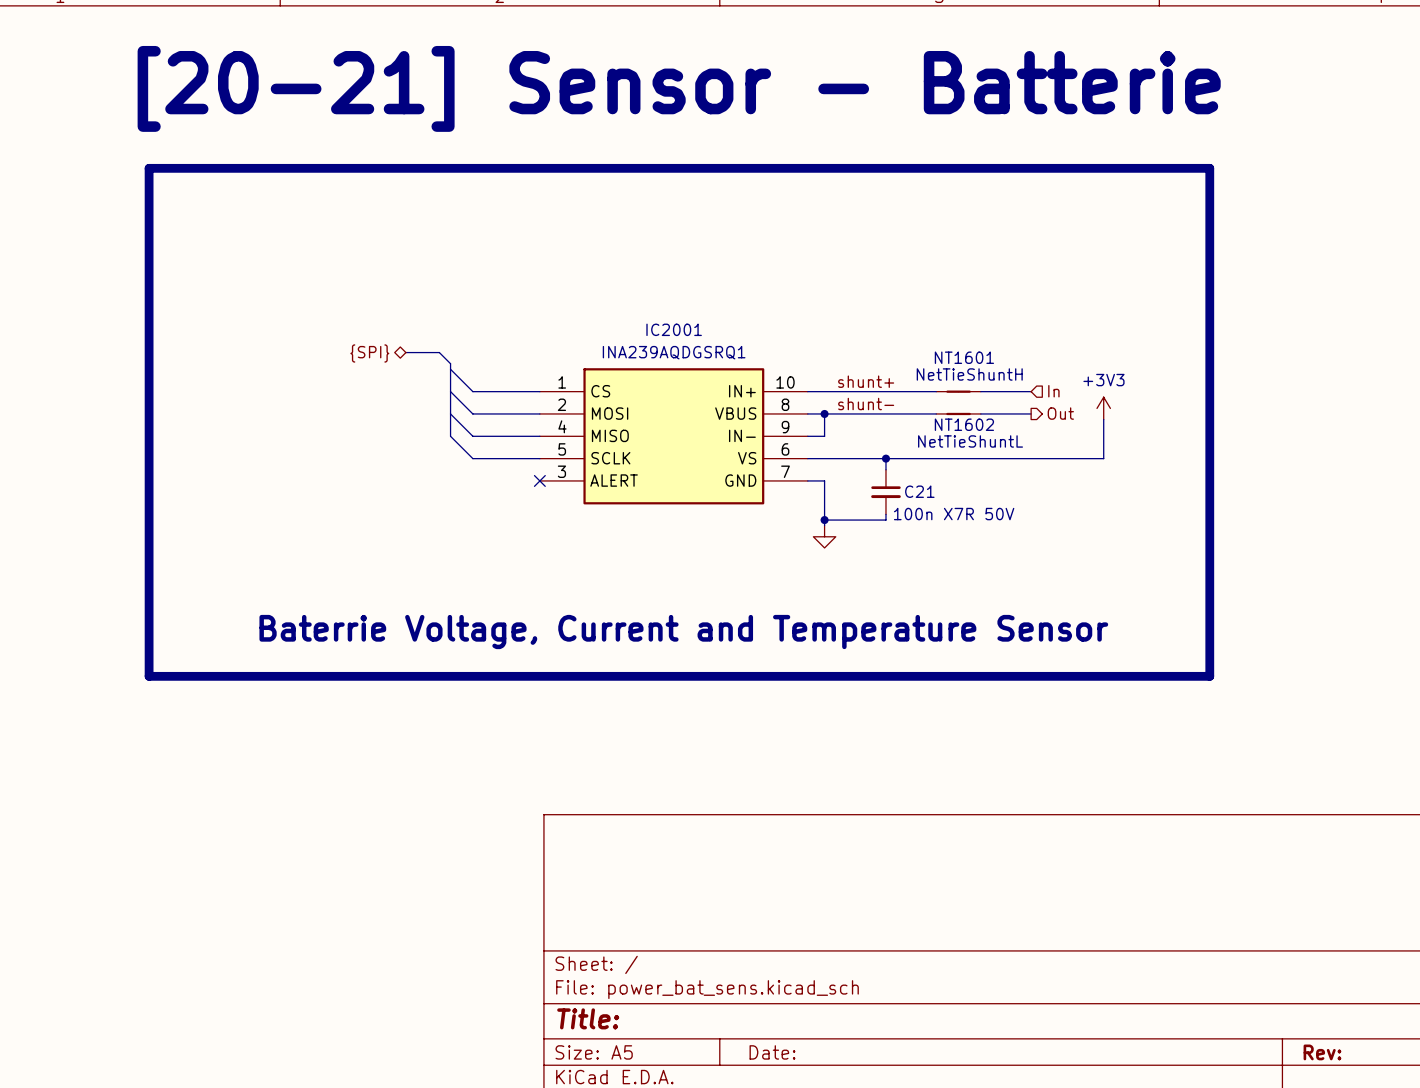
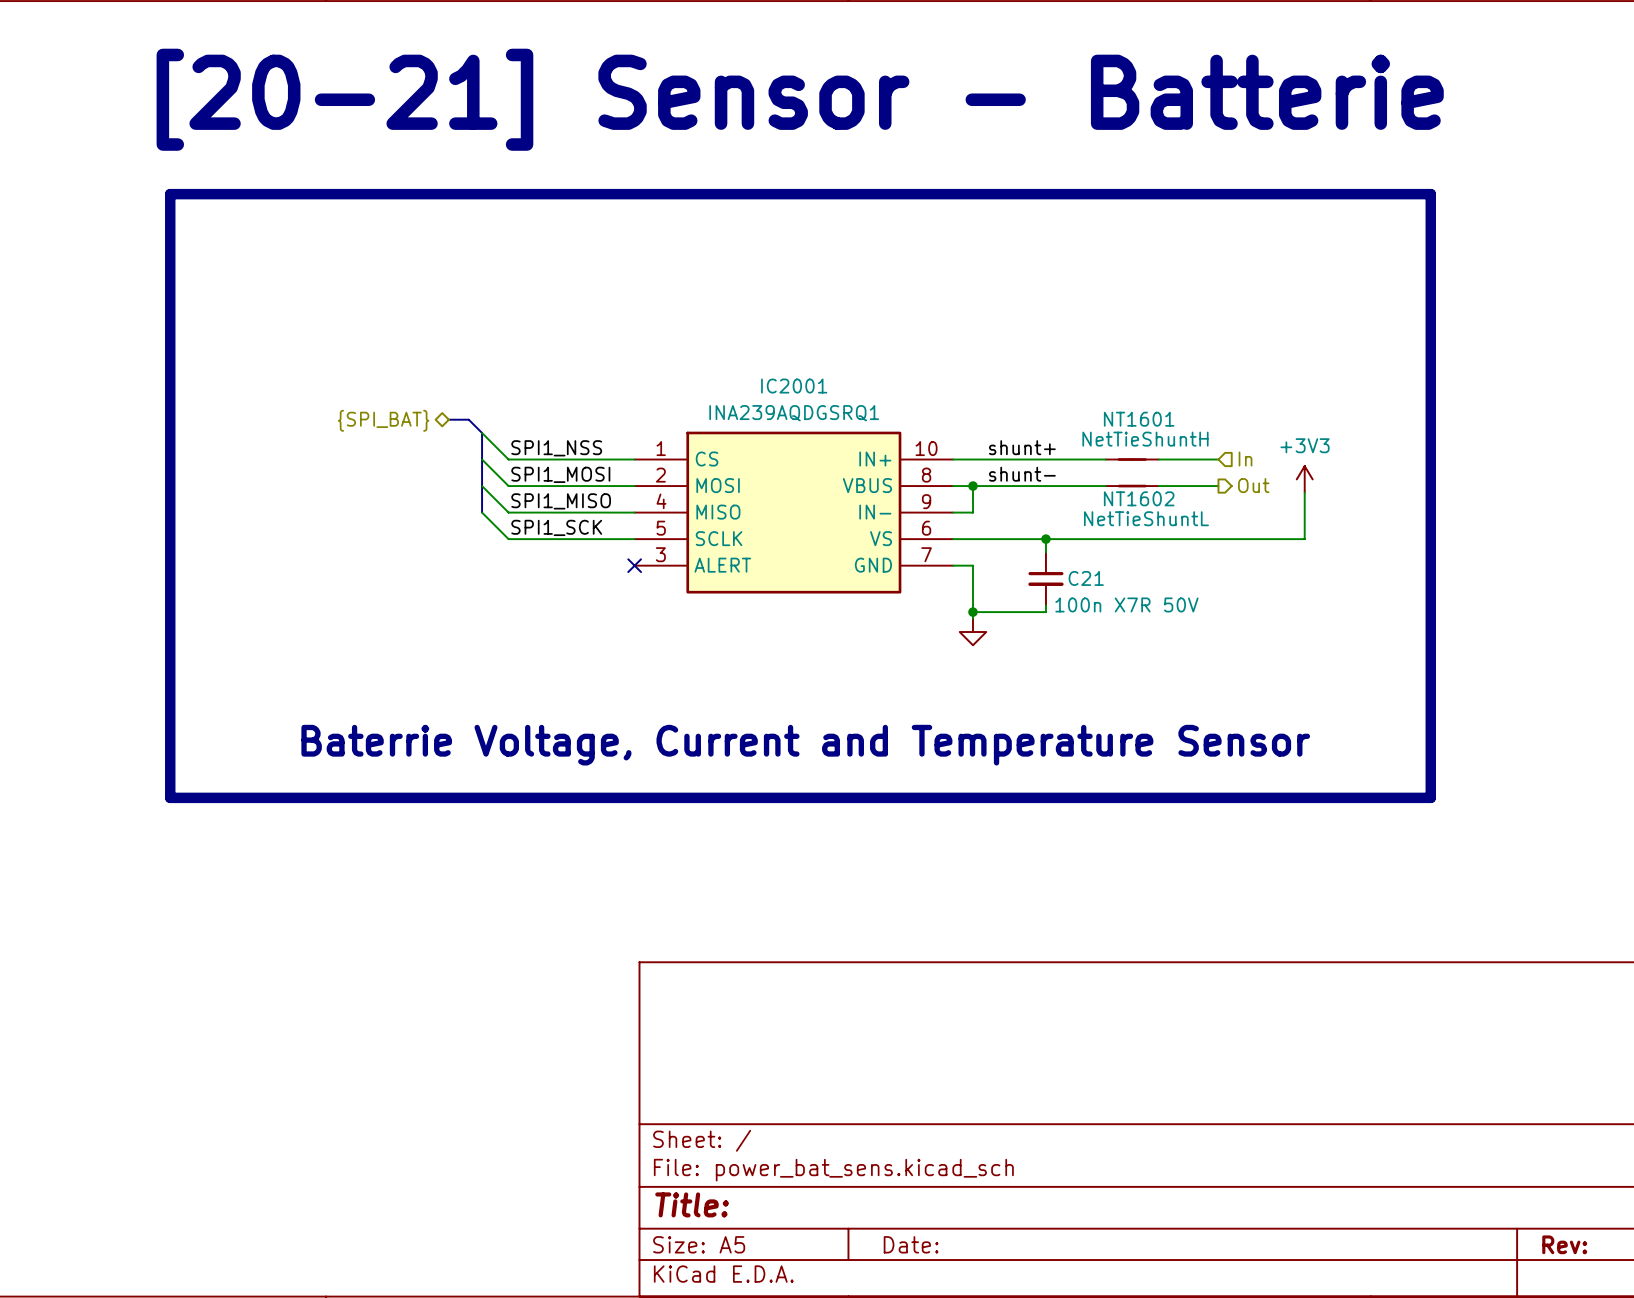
bus: (405, 352) (439, 352) (450, 363) (450, 436) -> none
hierarchical label: {SPI} (369, 353) -> {SPI_BAT} (383, 420)
bus: none -> (448, 419) (468, 419) (482, 432) (482, 512)
wire: (450, 369) (472, 391) -> (482, 432) (508, 459) (555, 459)
label: none -> SPI1_NSS (556, 448)
wire: (450, 391) (472, 413) -> (482, 459) (508, 486) (555, 486)
label: none -> SPI1_MOSI (560, 474)
wire: (450, 413) (472, 436) -> (482, 486) (508, 512) (555, 512)
label: none -> SPI1_MISO (561, 501)
wire: (450, 436) (472, 458) -> (482, 512) (508, 539) (555, 539)
label: none -> SPI1_SCK (556, 527)

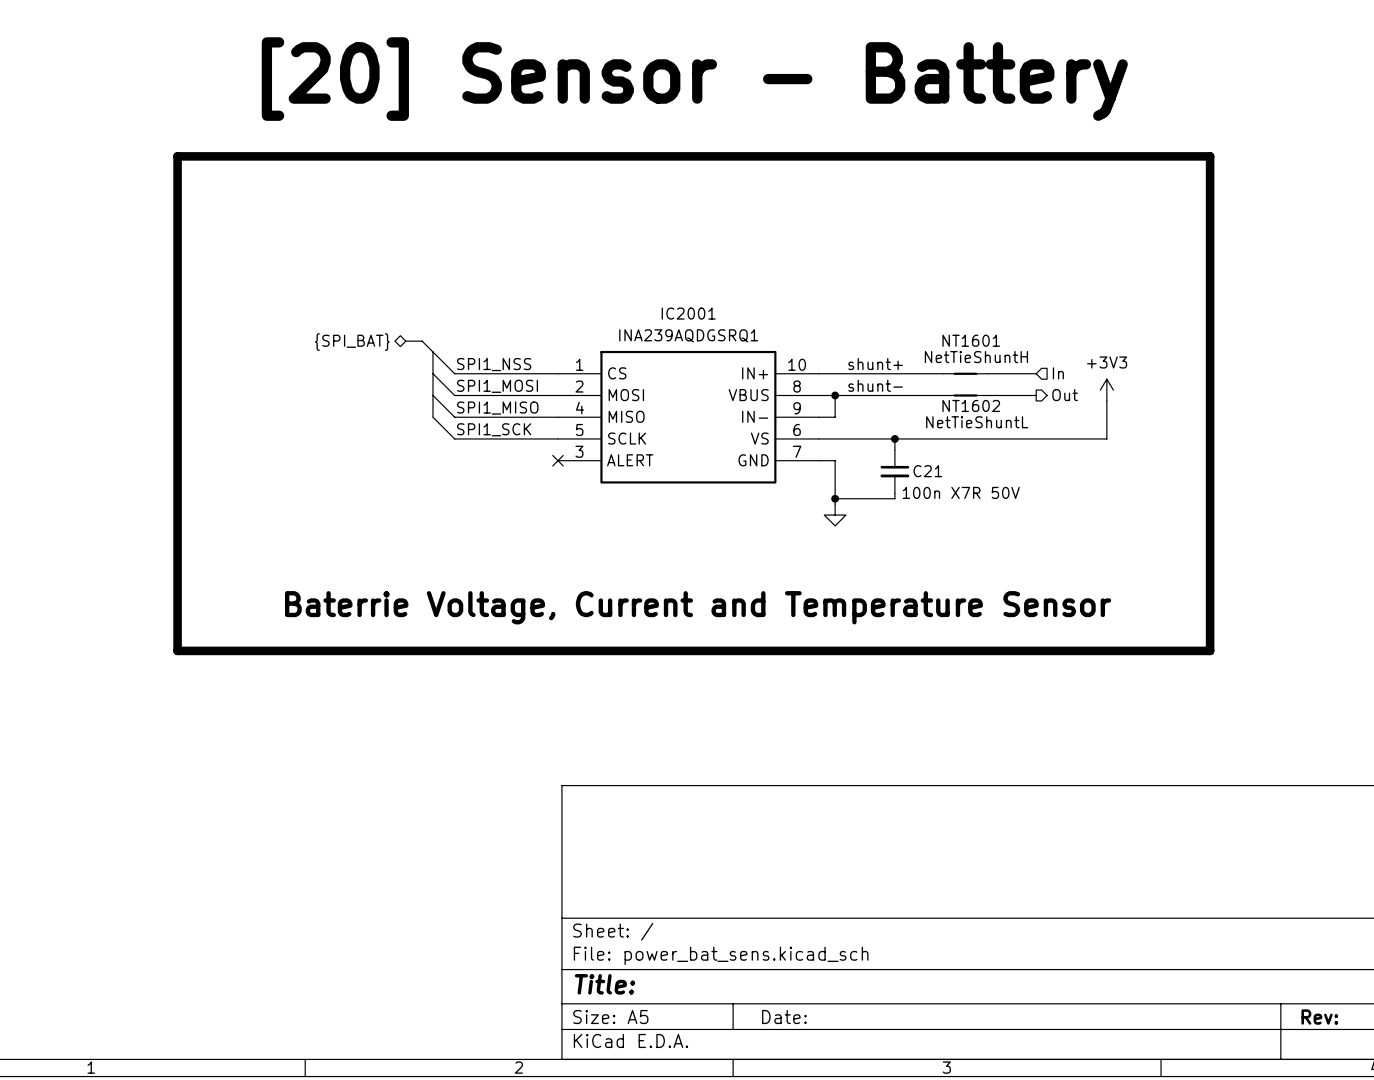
text: [20-21] Sensor - Batterie (800, 99) -> [20] Sensor - Battery (694, 79)

